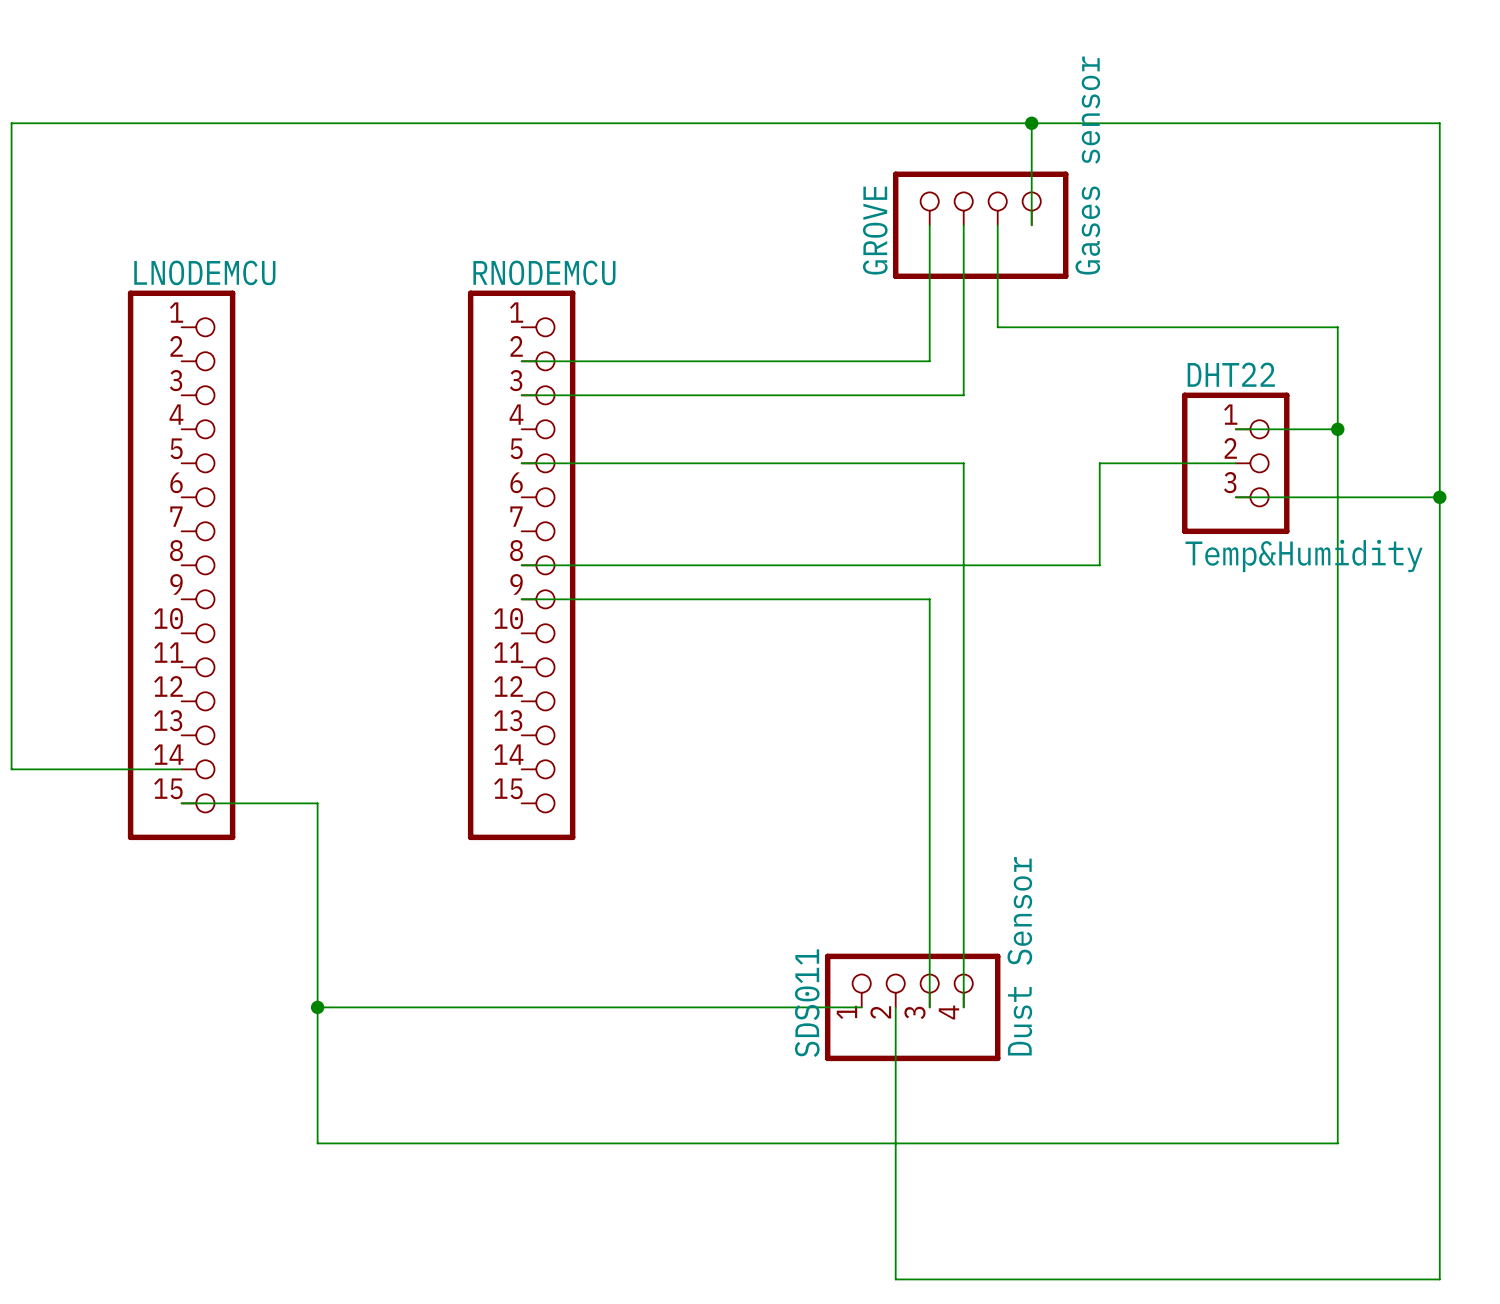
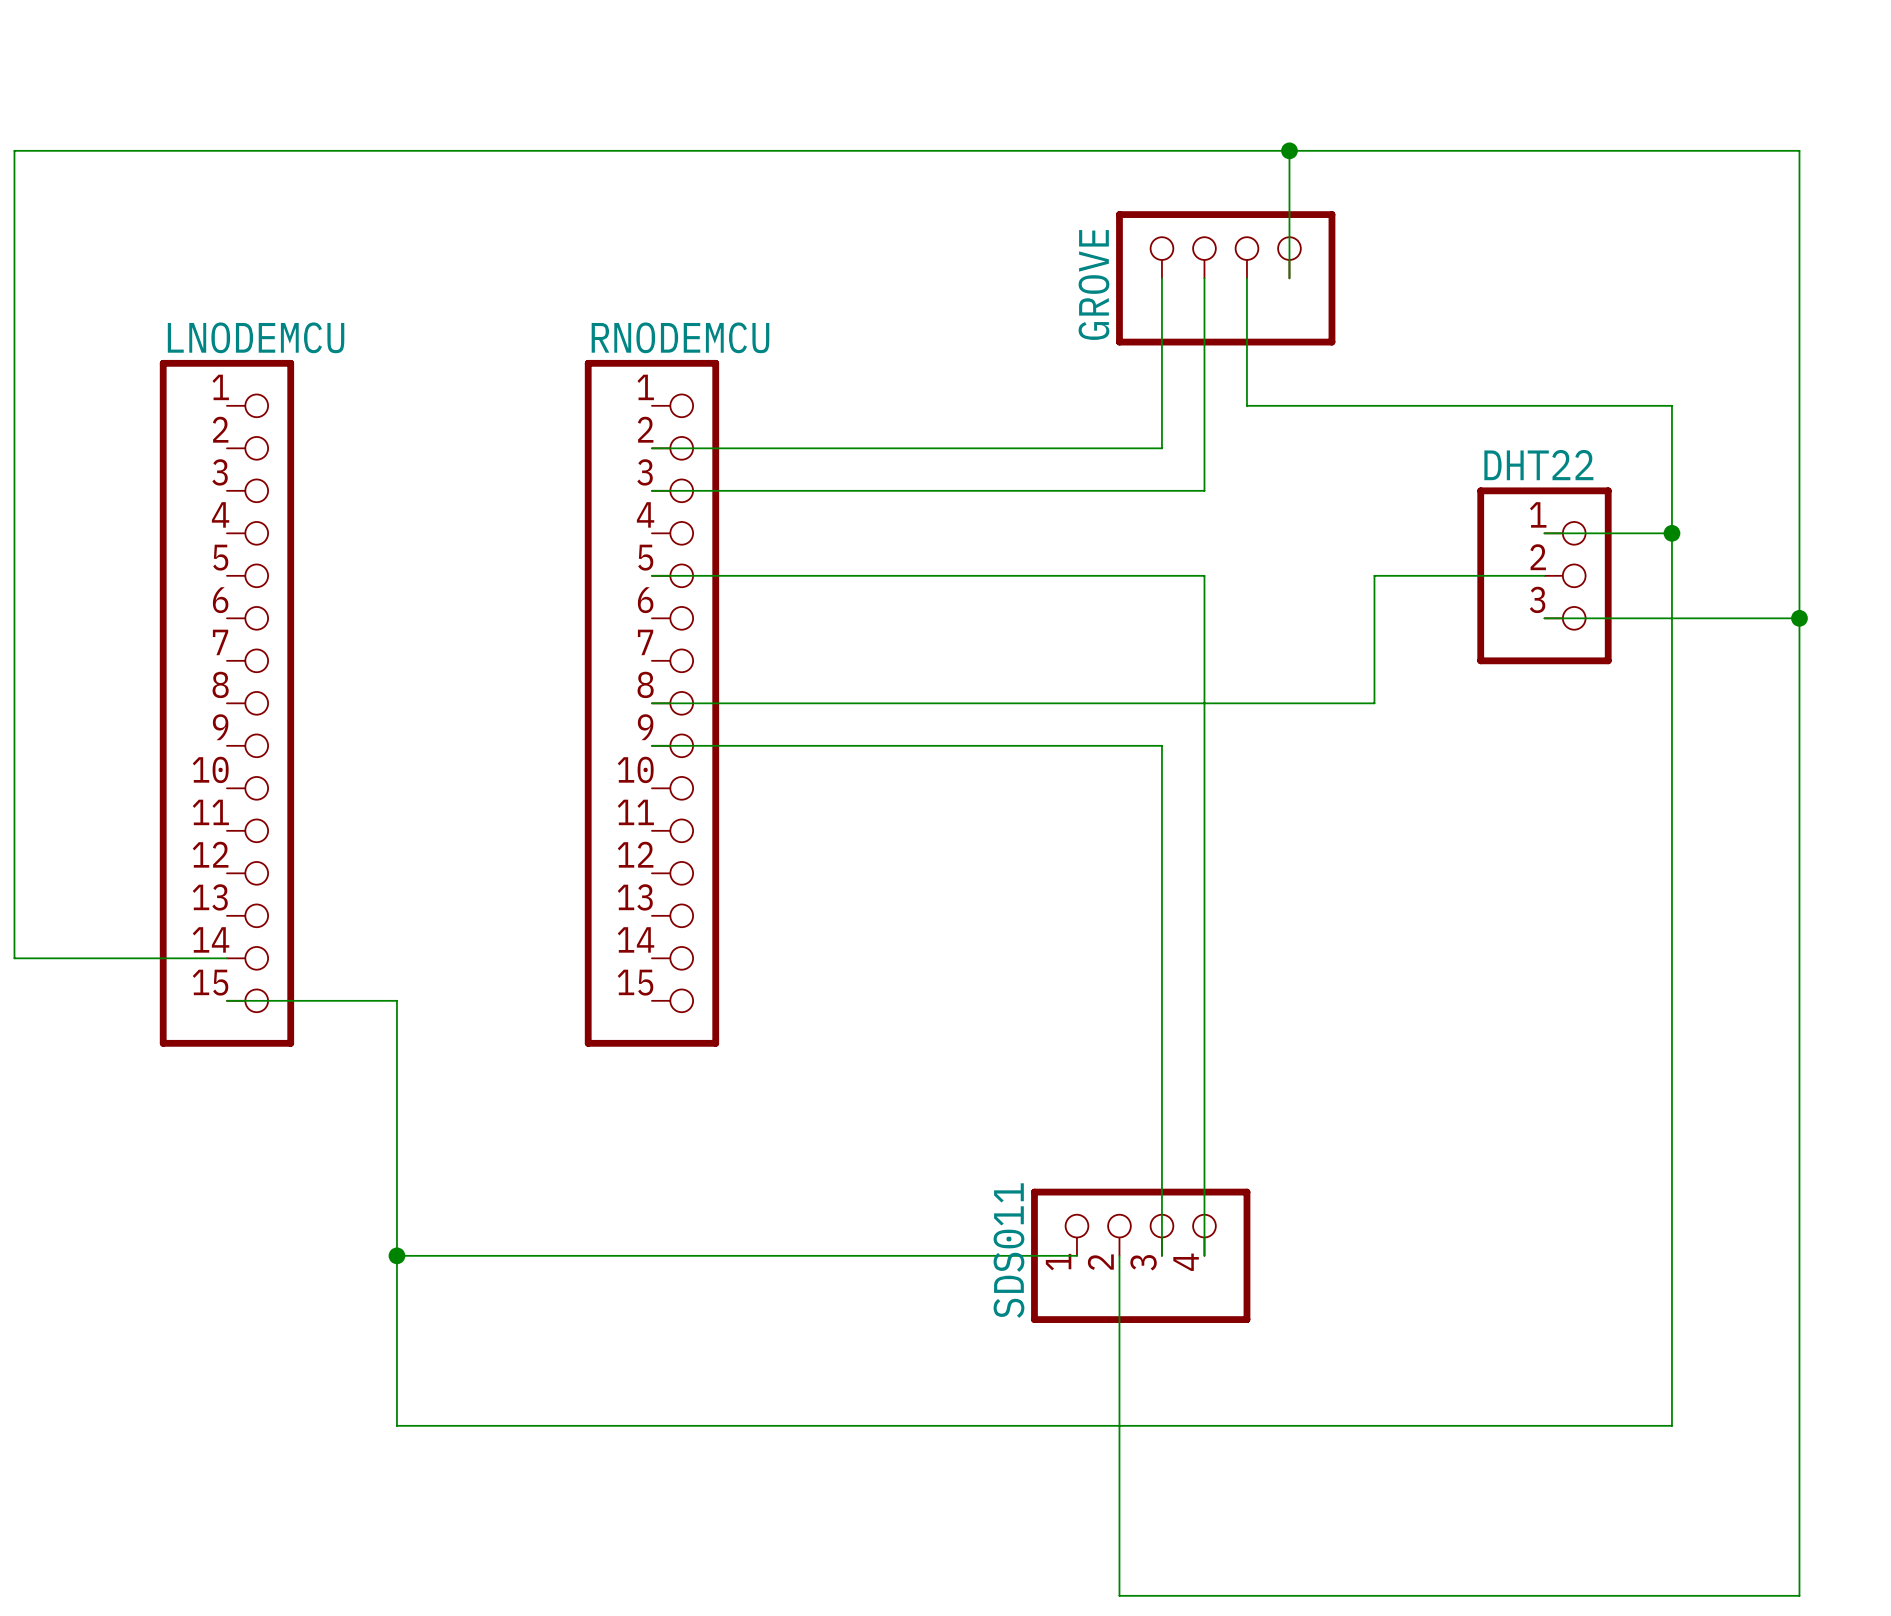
GROVE value: Gases sensor (1087, 165) -> none
DHT22 value: Temp&Humidity (1304, 555) -> none
SDS011 value: Dust Sensor (1019, 956) -> none

